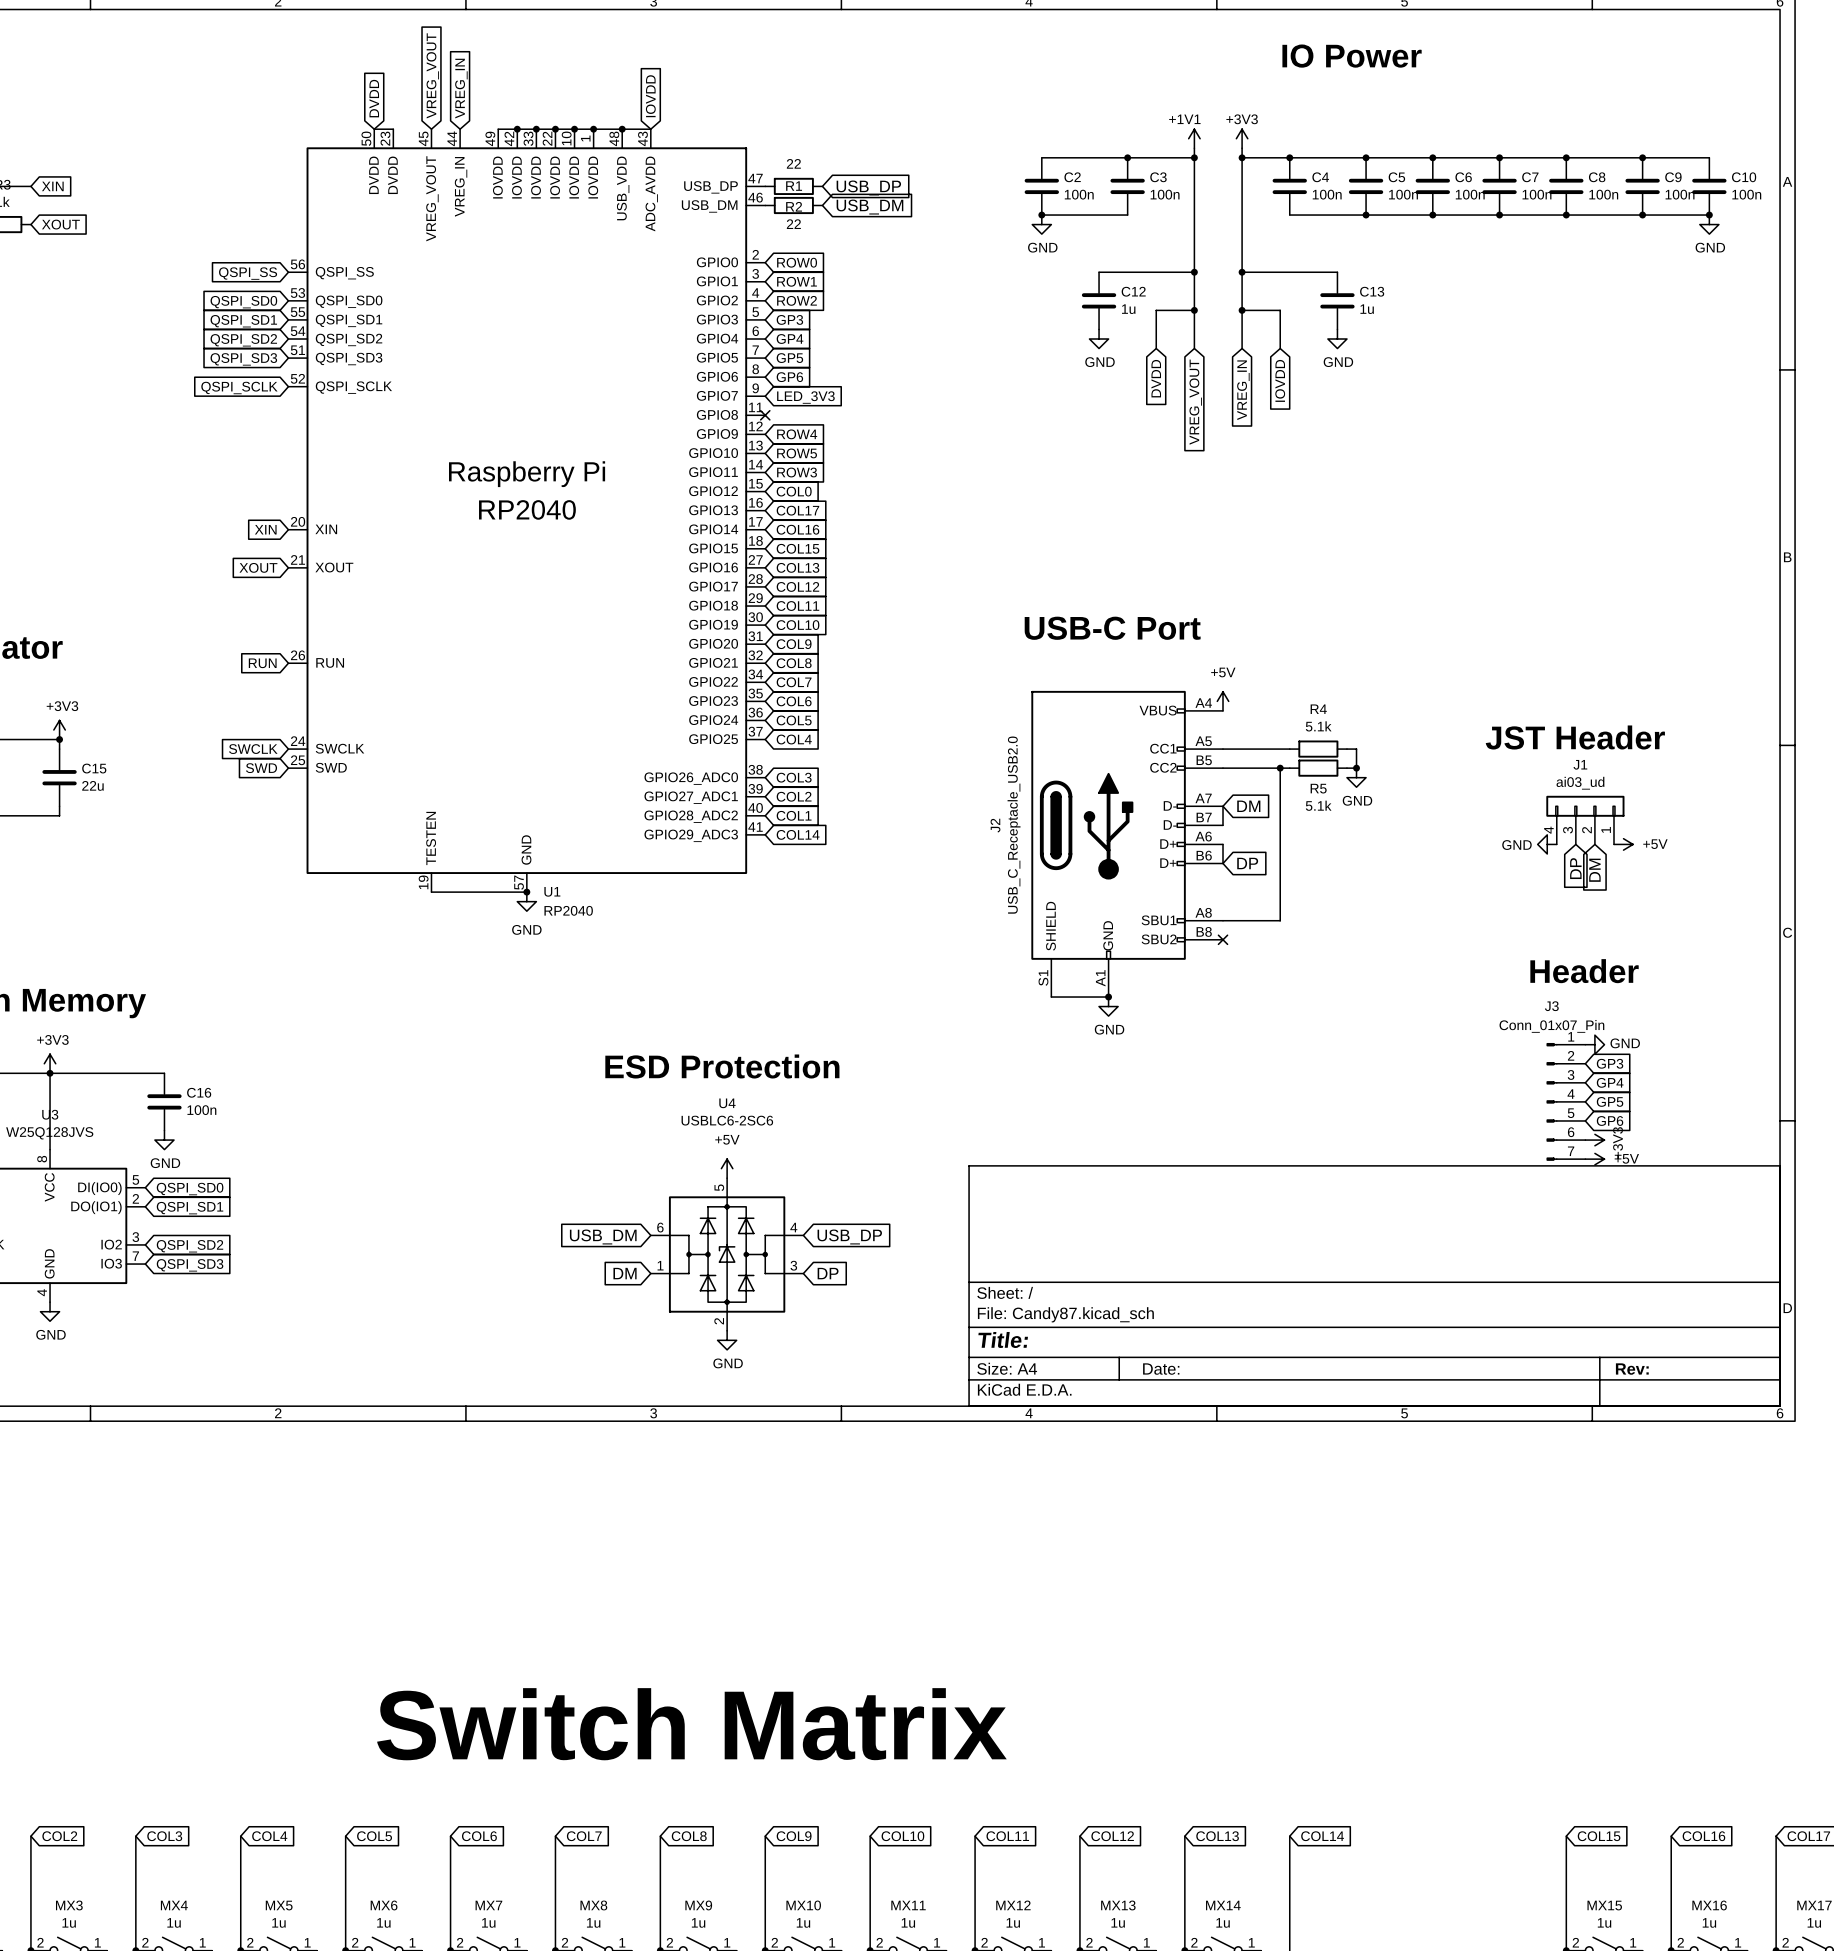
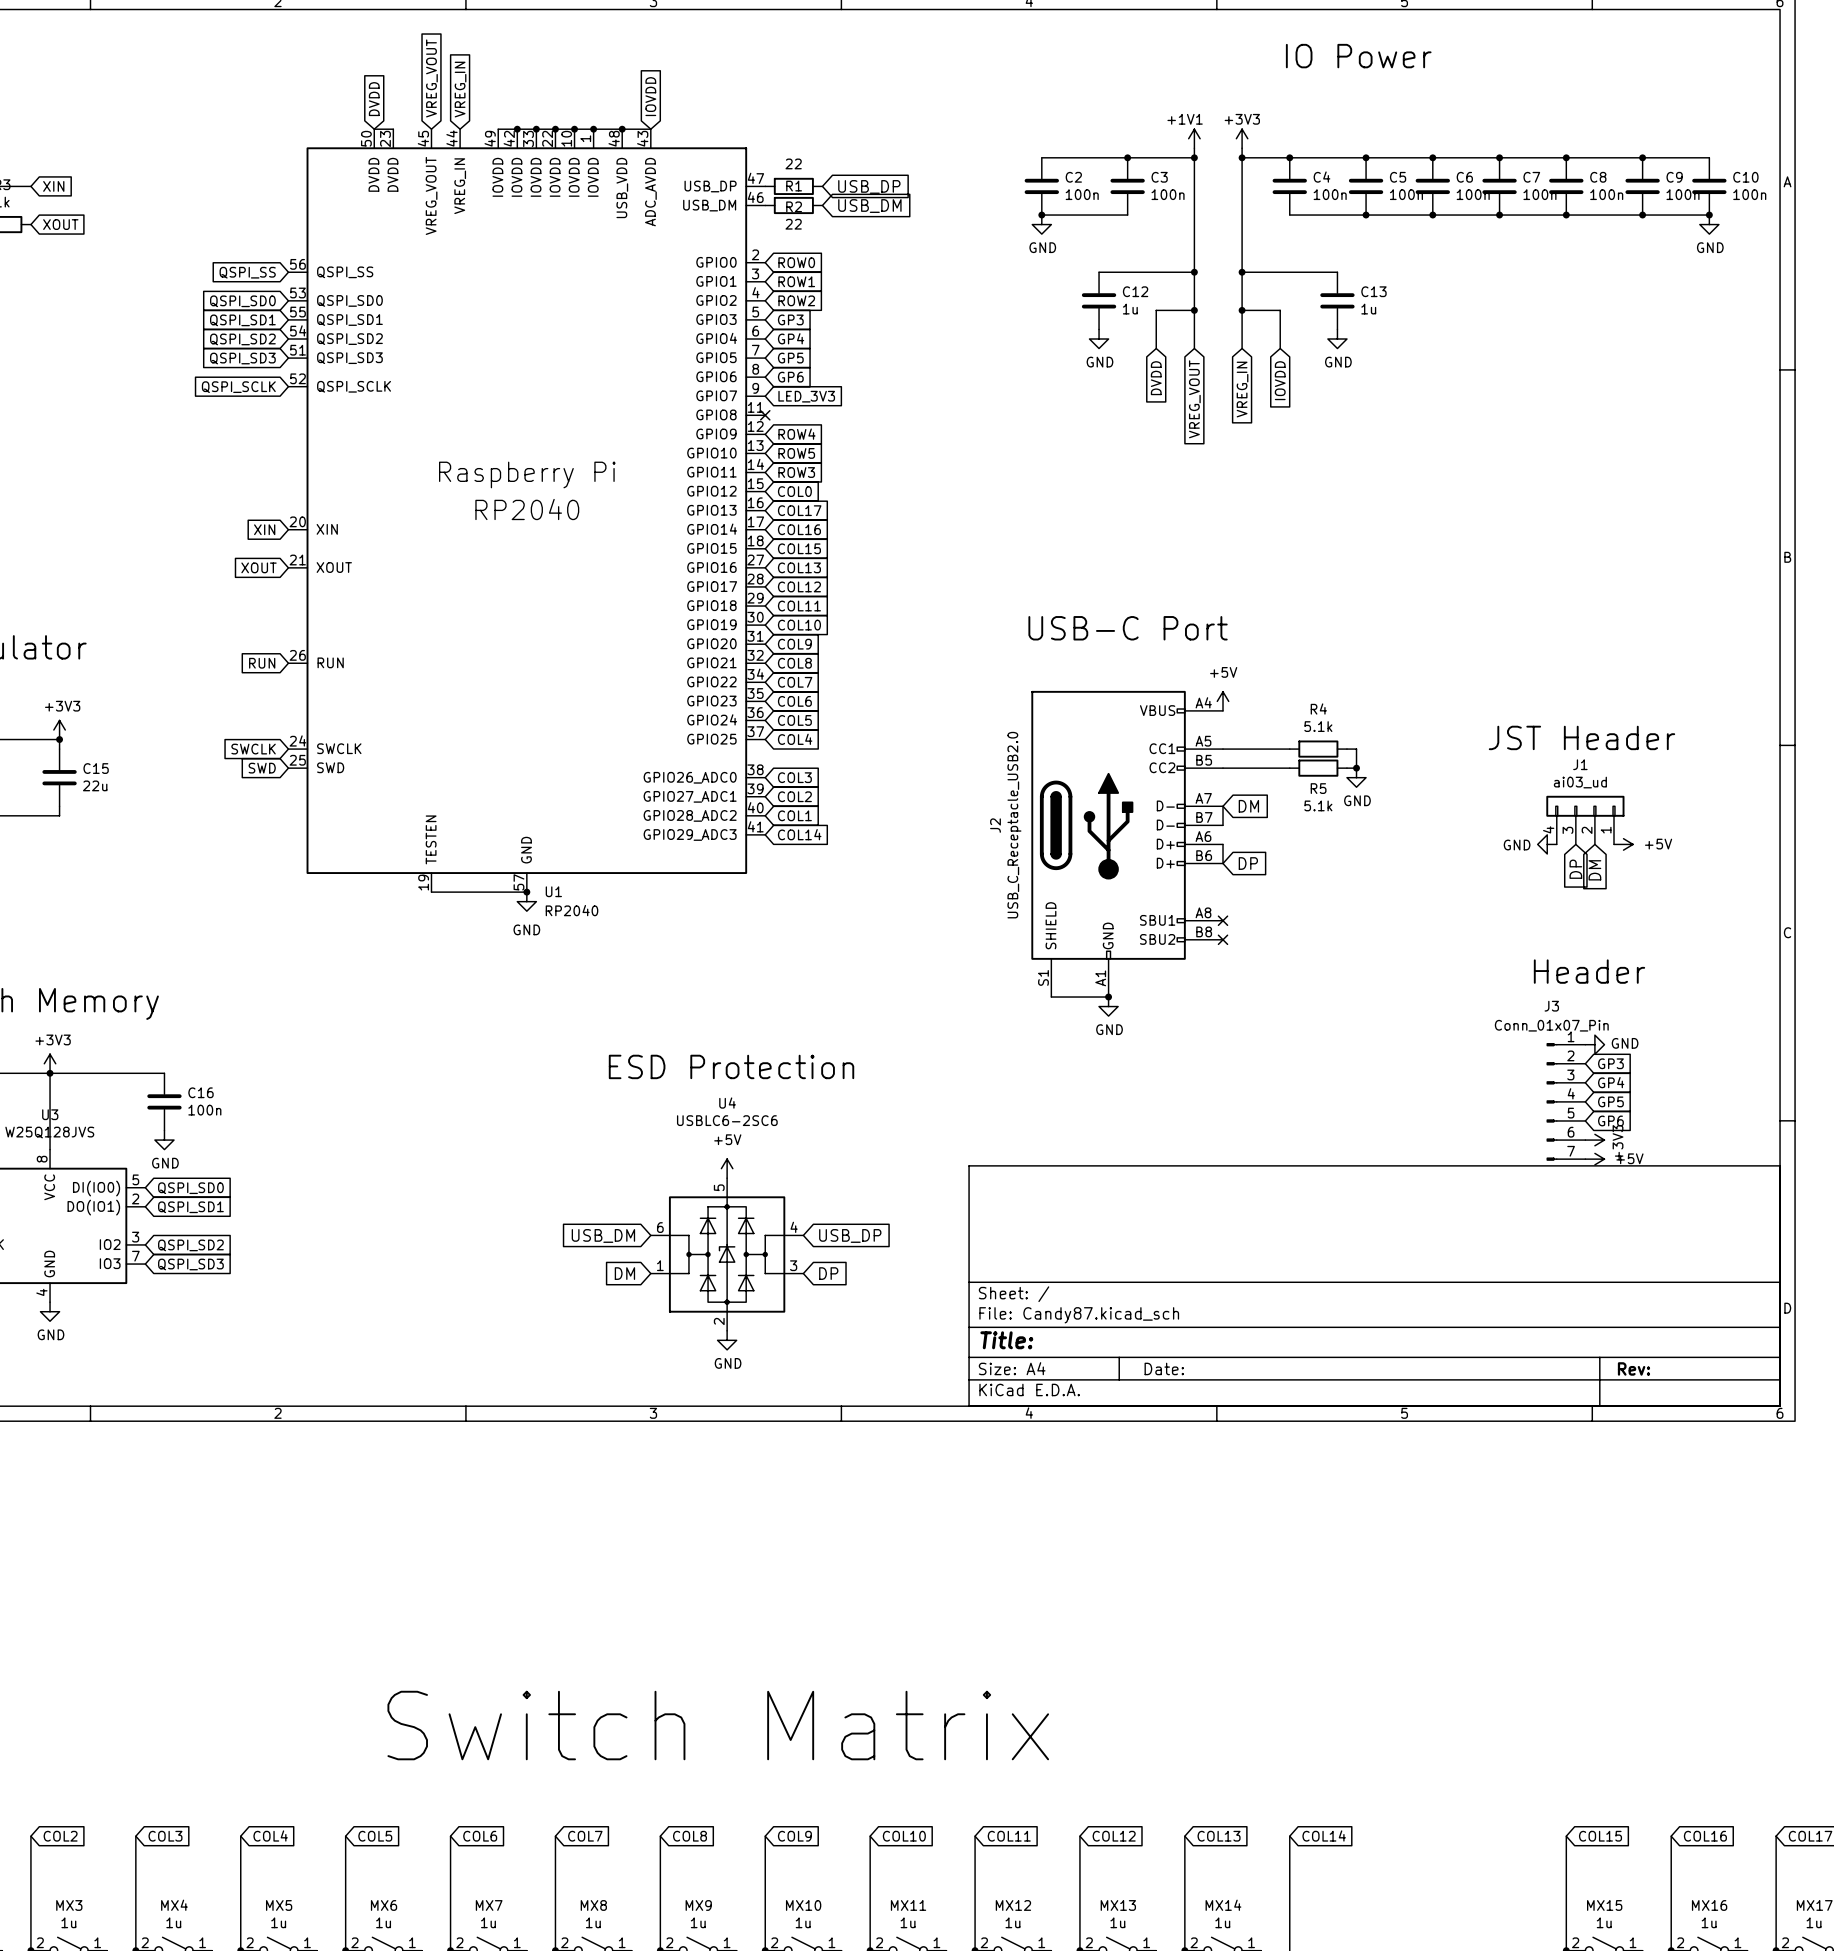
wire: (1280, 768) (1280, 920) (1223, 920) -> none
junction: (1280, 768) -> none
no-connect mark: none -> (1223, 920)

